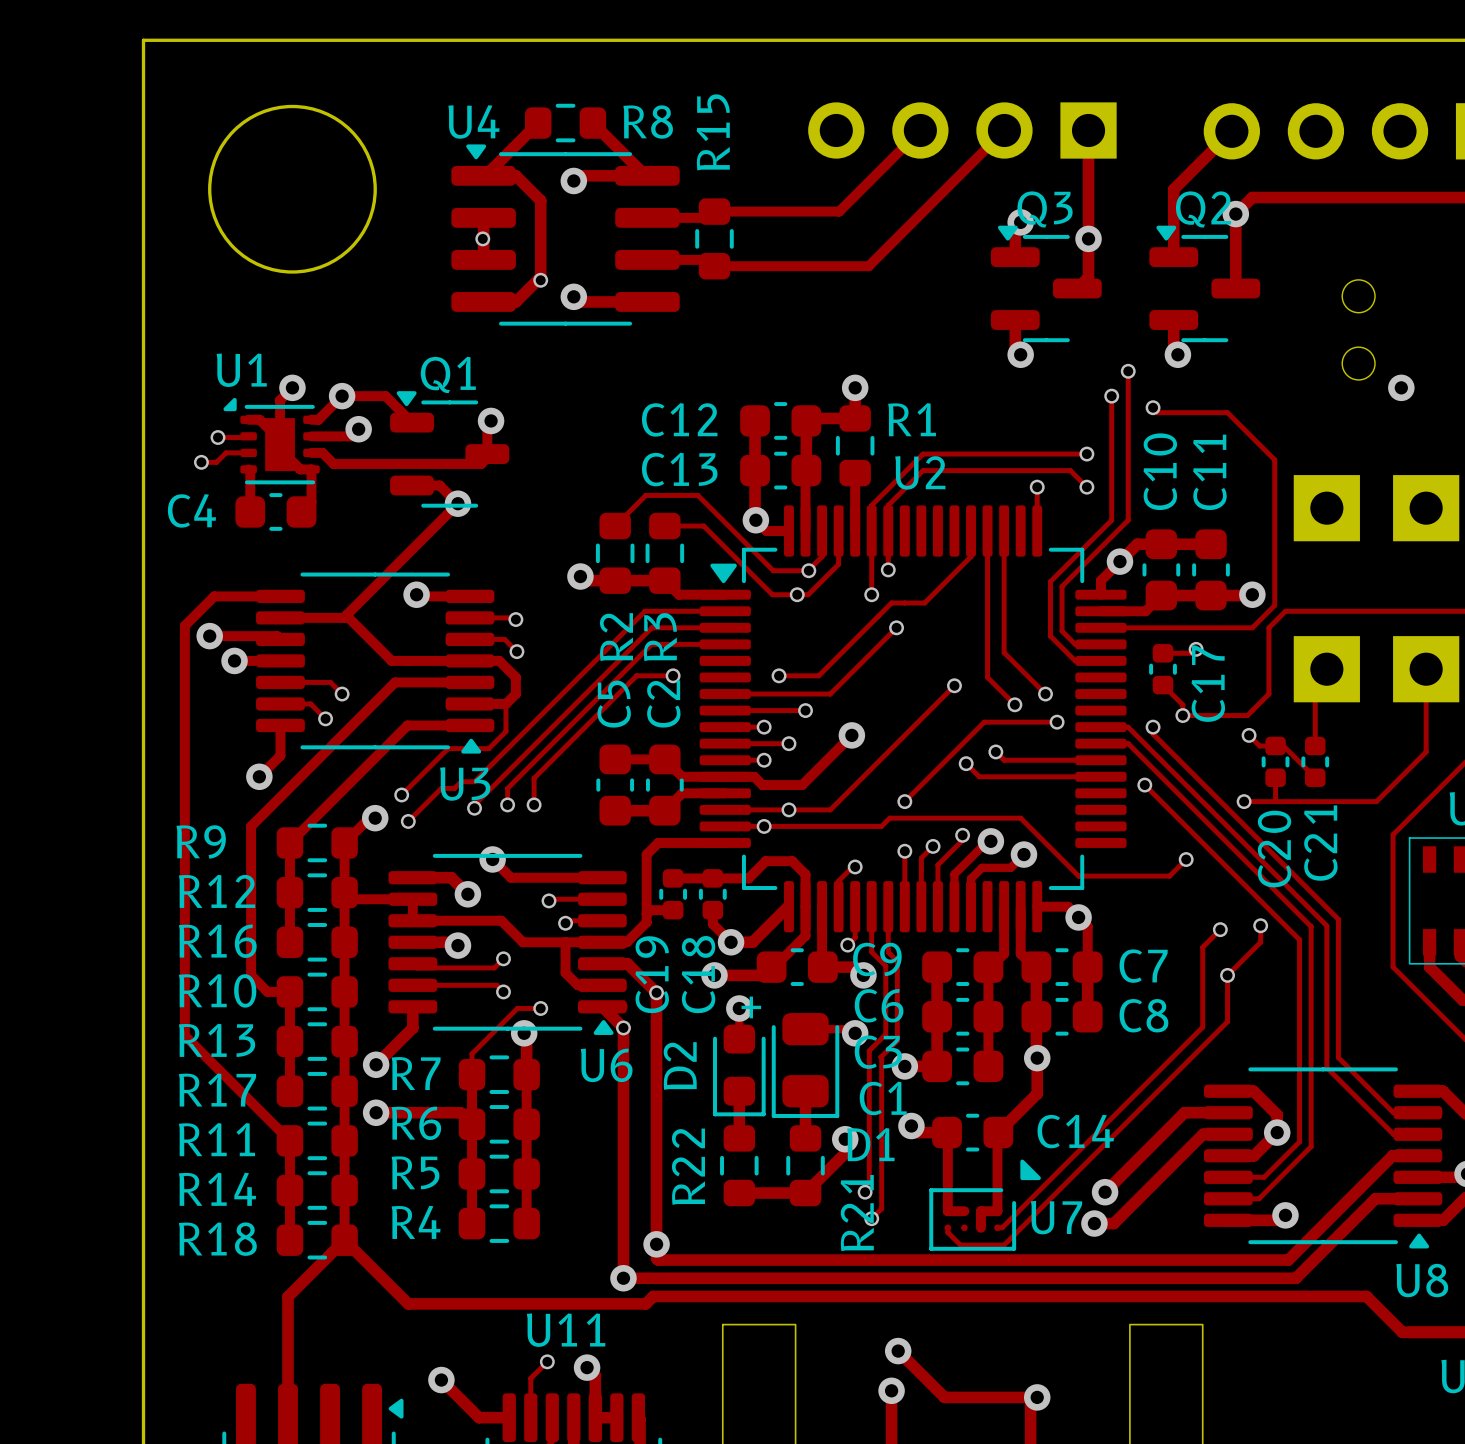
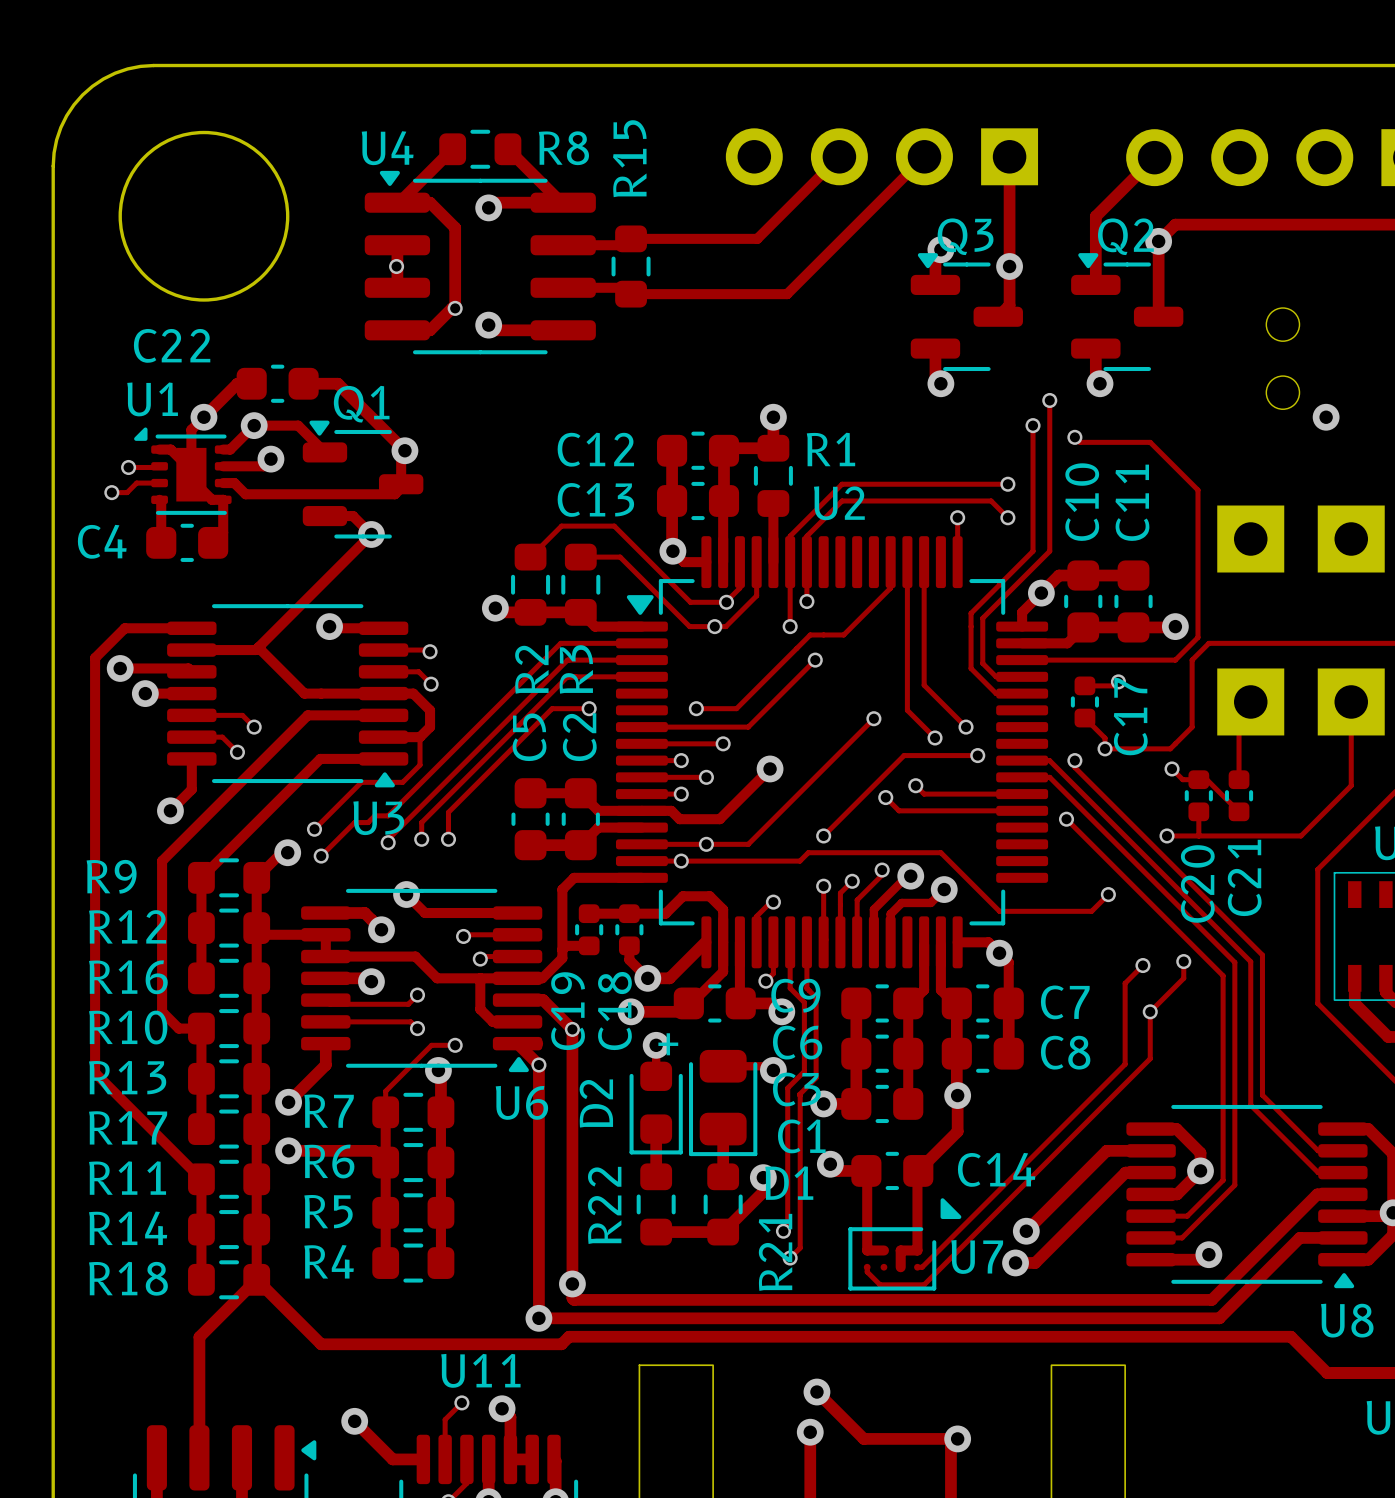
board edge: (242, 40) (143, 40) (143, 139) -> (153, 65) (127, 68) (115, 73) (92, 86) (82, 94) (66, 115) (60, 127) (54, 152) (53, 166)
track: none -> (251, 383) (237, 383) (203, 417)
C22: none -> (277, 383)
track: none -> (303, 383) (337, 383) (404, 450)

